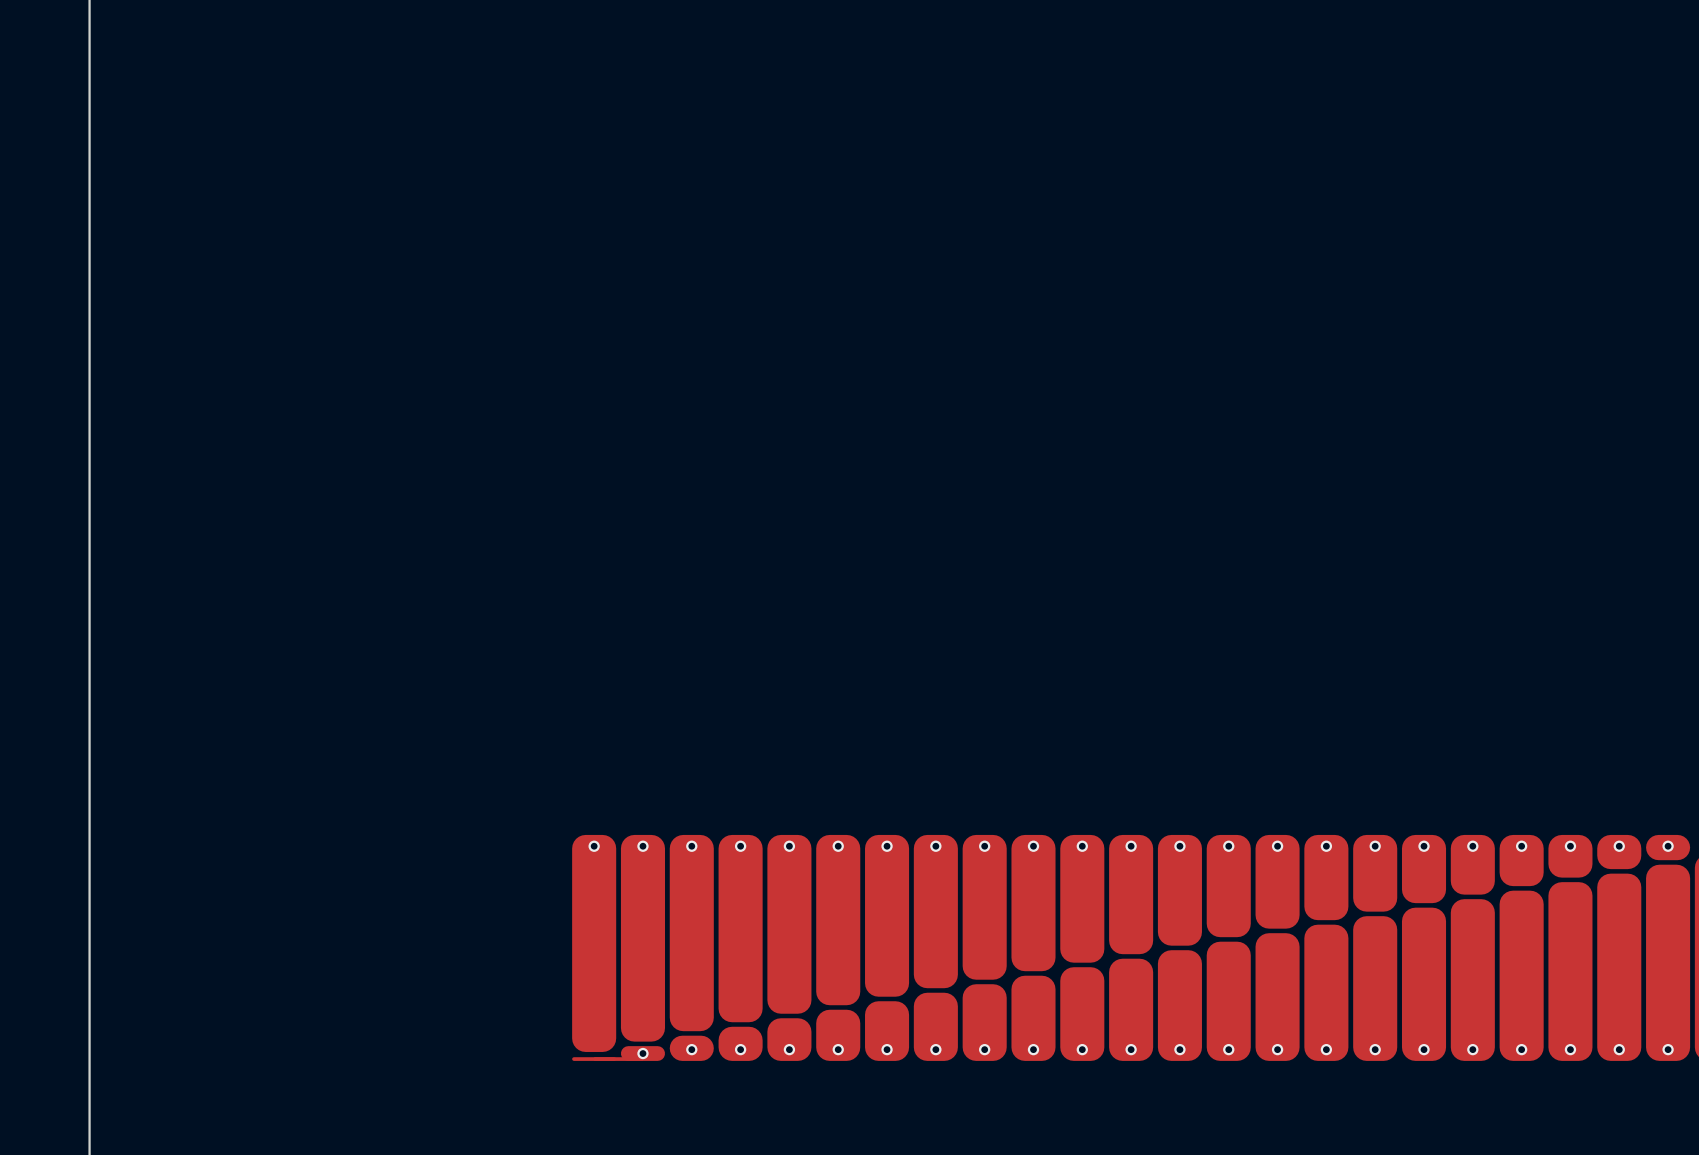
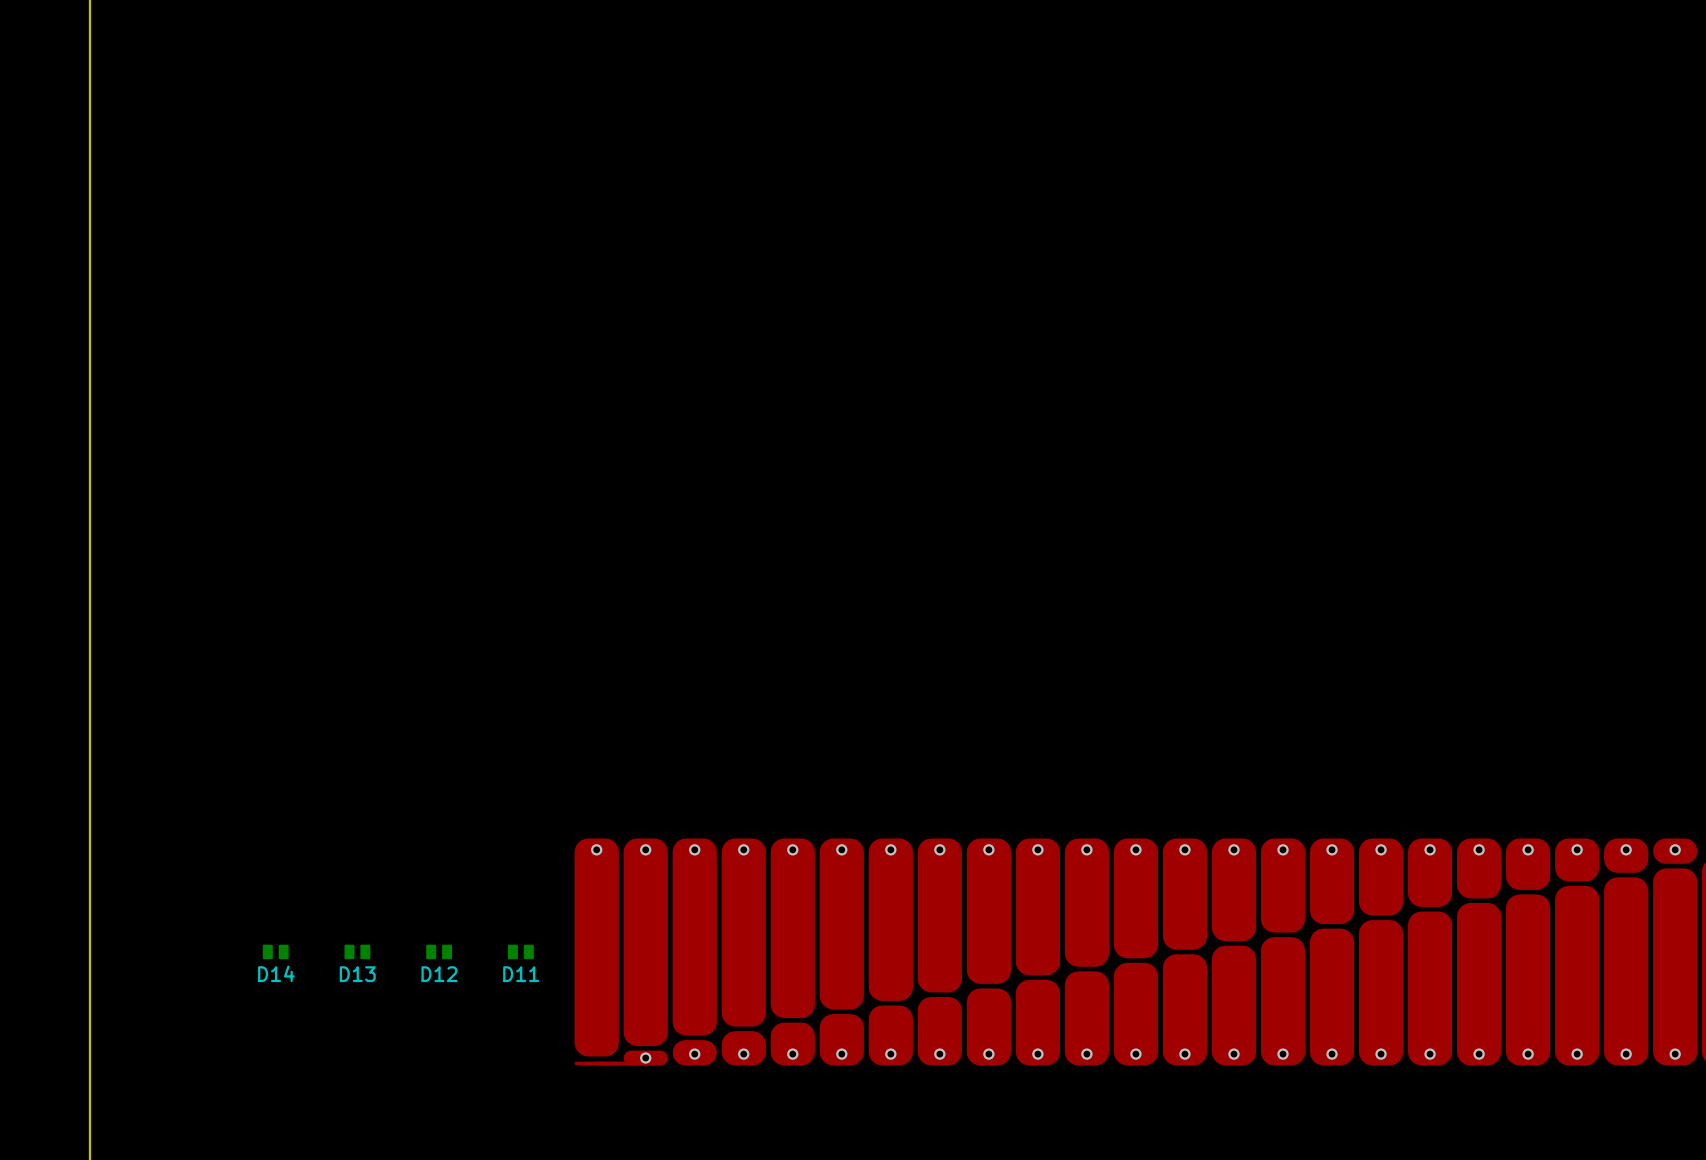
D14: none -> (275, 951)
D13: none -> (357, 951)
D12: none -> (439, 951)
D11: none -> (520, 951)

